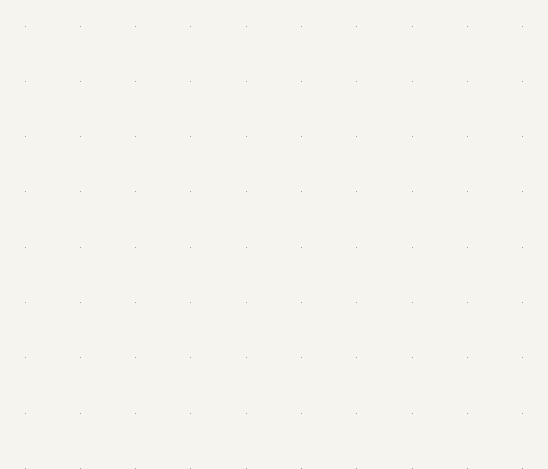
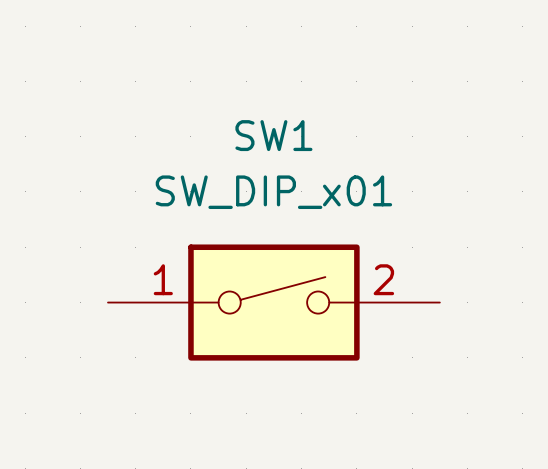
SW1: none -> SW_DIP_x01 (273, 302)

